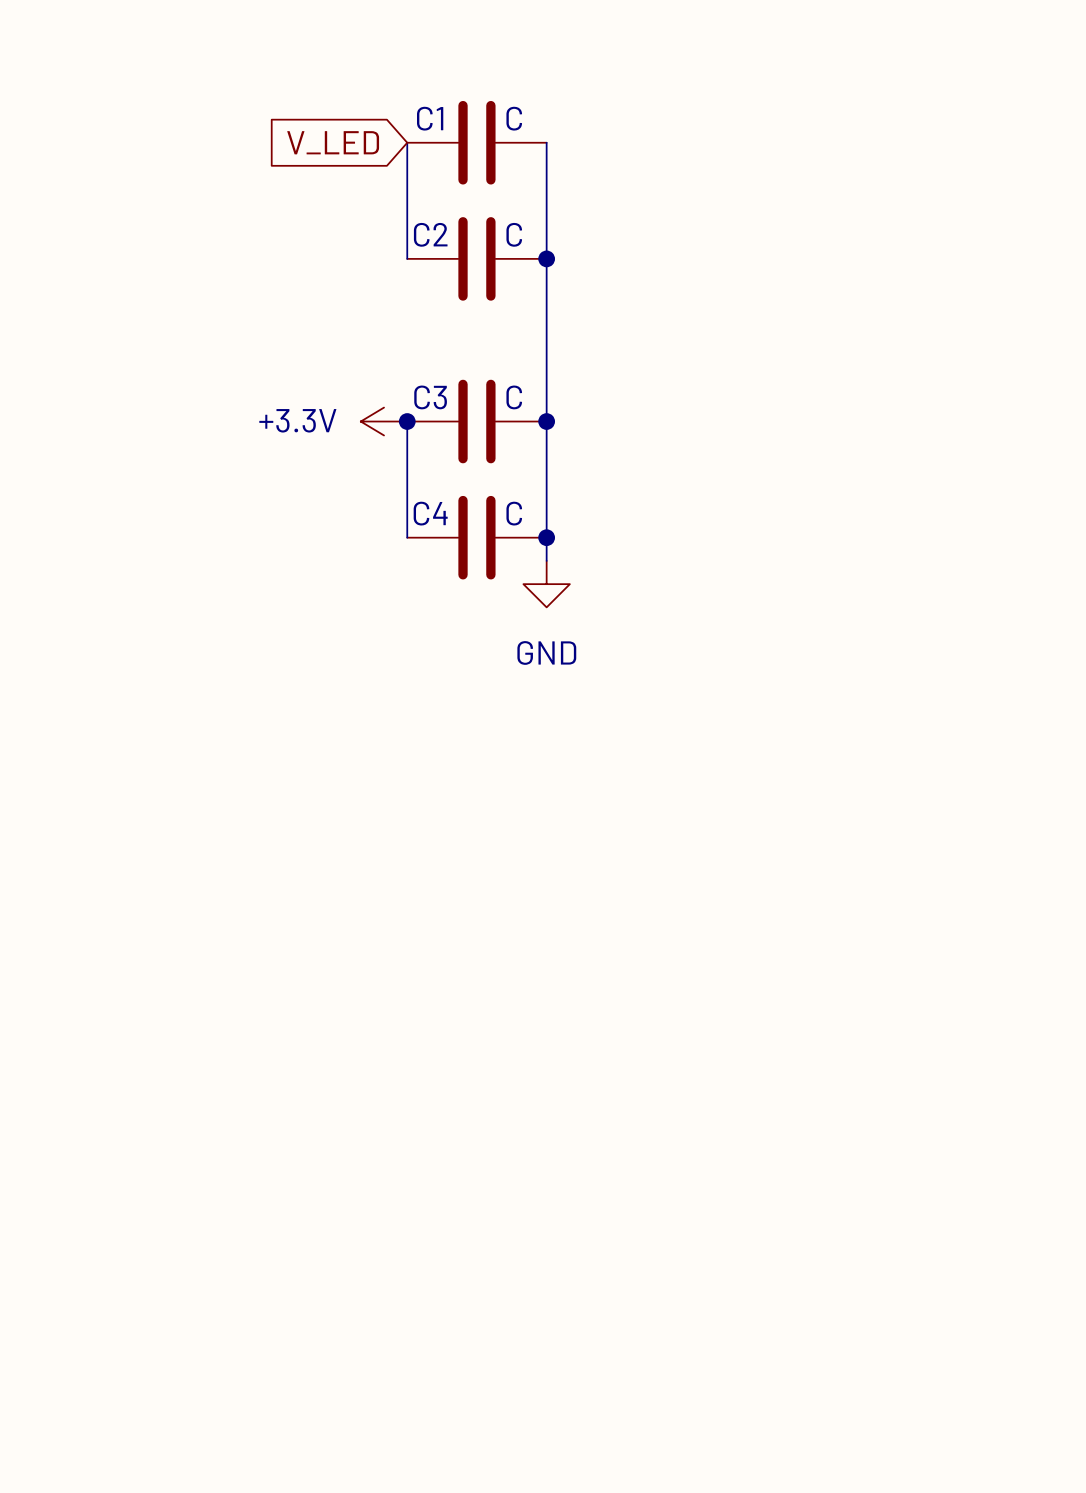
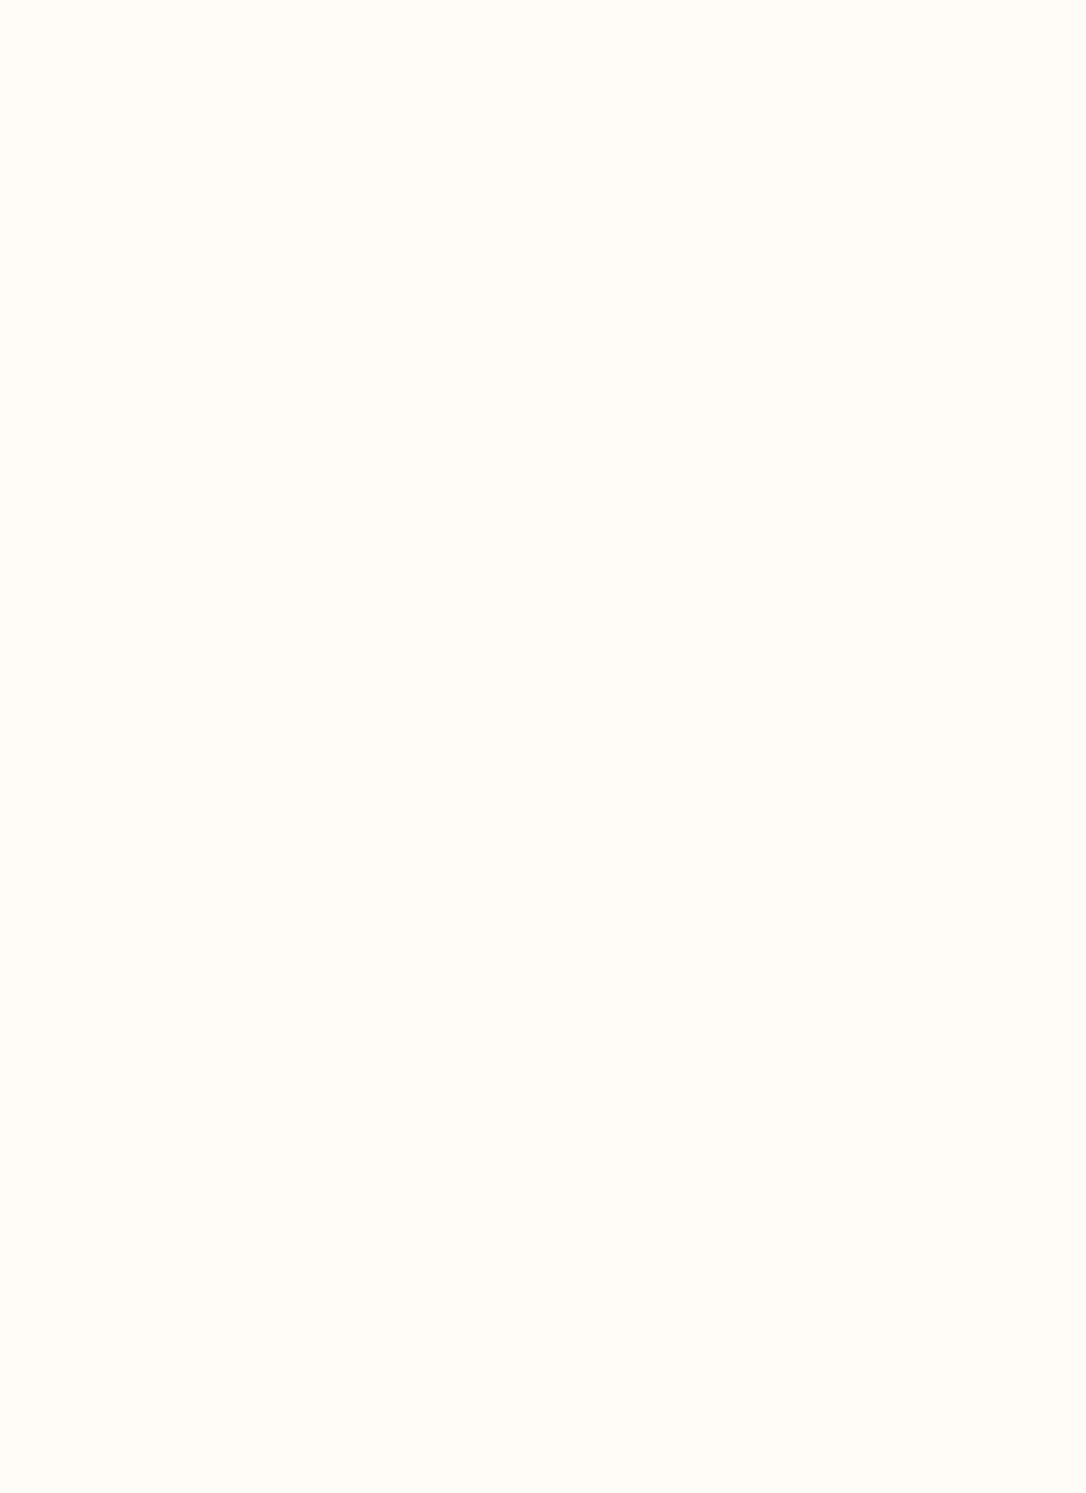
global label: V_LED (333, 142) -> none
wire: (407, 142) (407, 258) -> none
C1: C (476, 142) -> none
wire: (546, 142) (546, 560) -> none
C2: C (476, 258) -> none
junction: (546, 258) -> none
power symbol: +3.3V (384, 421) -> none
wire: (407, 421) (407, 537) -> none
junction: (407, 421) -> none
C3: C (476, 421) -> none
junction: (546, 421) -> none
C4: C (476, 537) -> none
junction: (546, 537) -> none
power symbol: GND (546, 584) -> none

